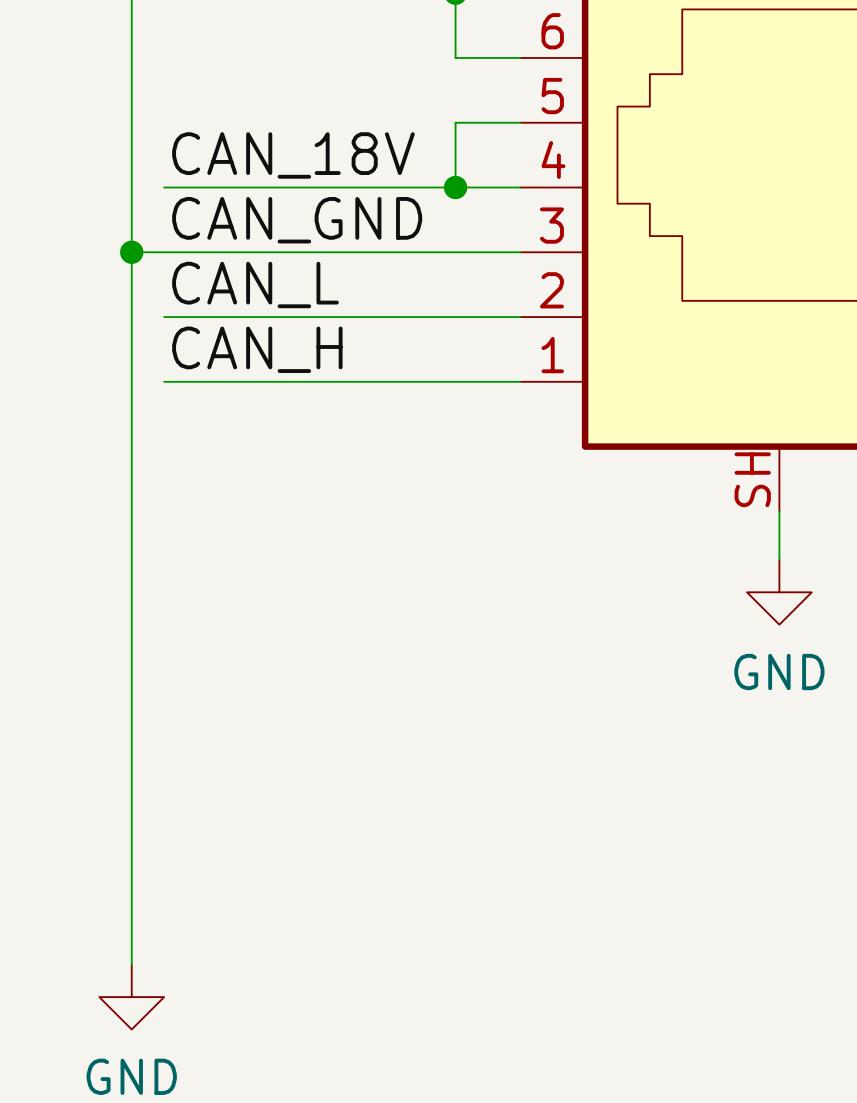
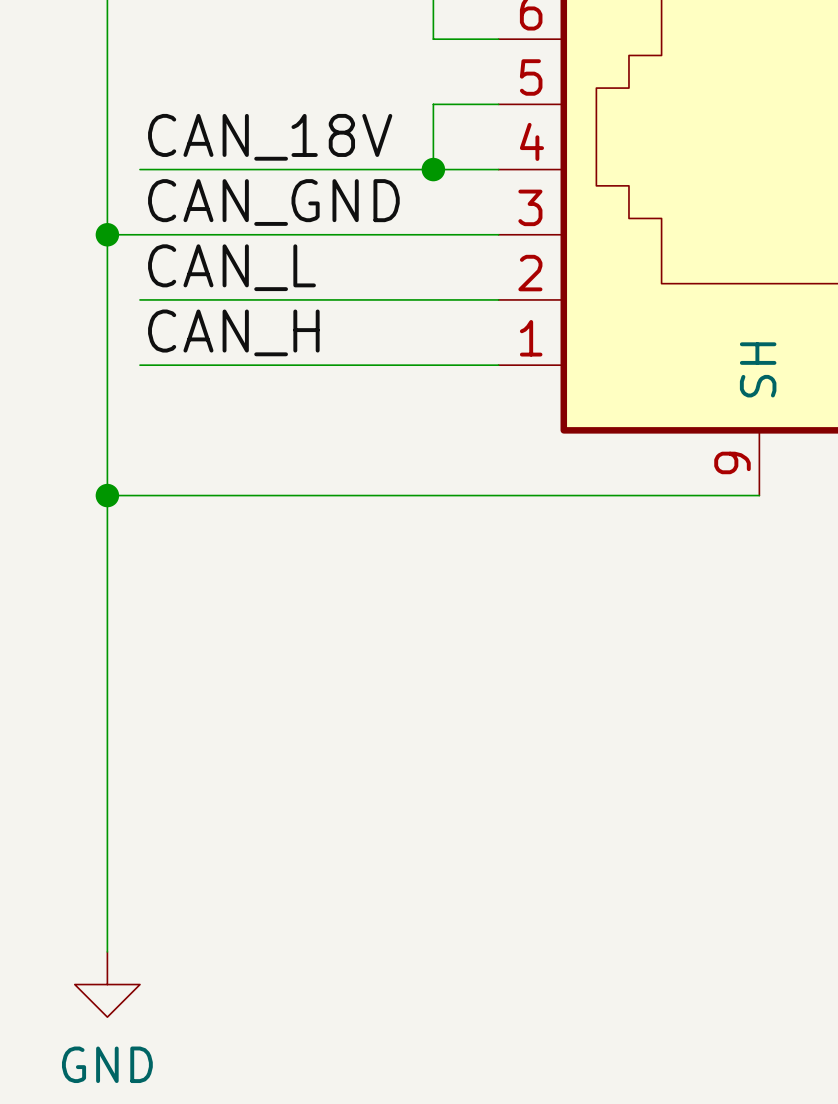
part pin name: none -> SH (758, 369)
part pin number: SH (752, 479) -> 9 (732, 462)
junction: none -> (107, 495)
wire: (779, 511) (779, 559) -> (759, 495) (107, 495)
power symbol: GND (779, 592) -> none

